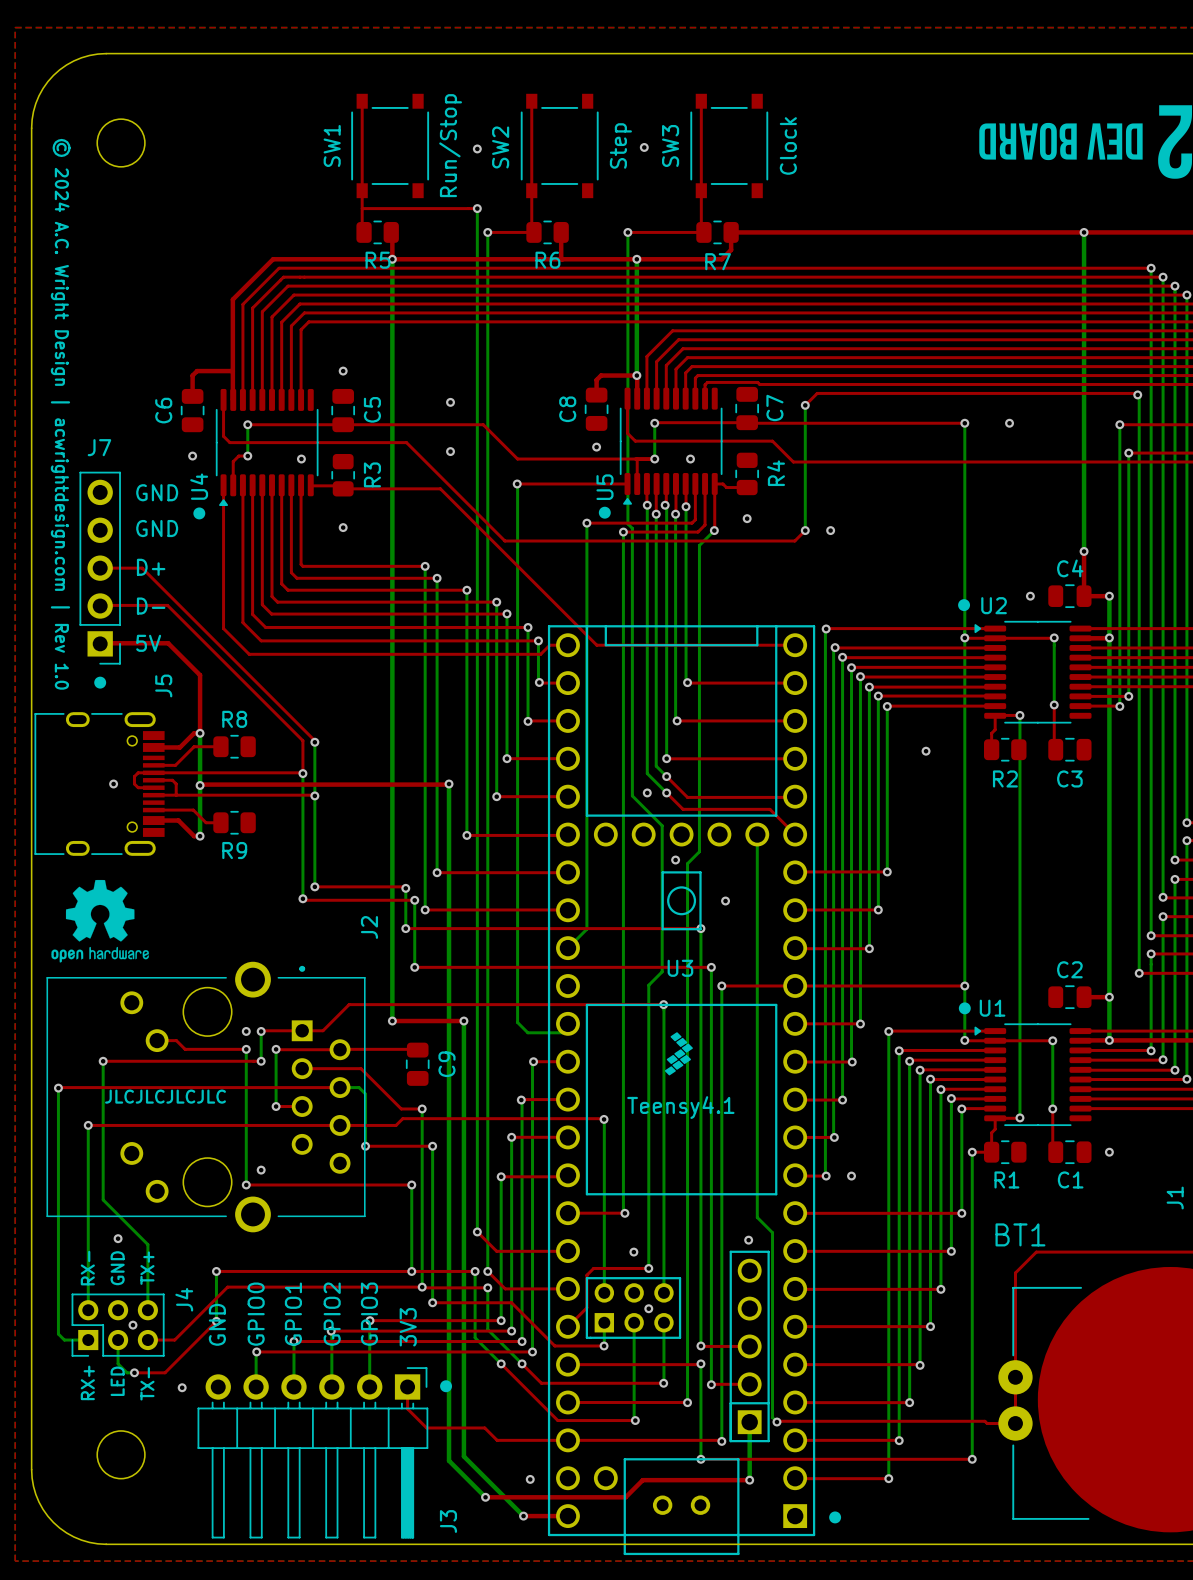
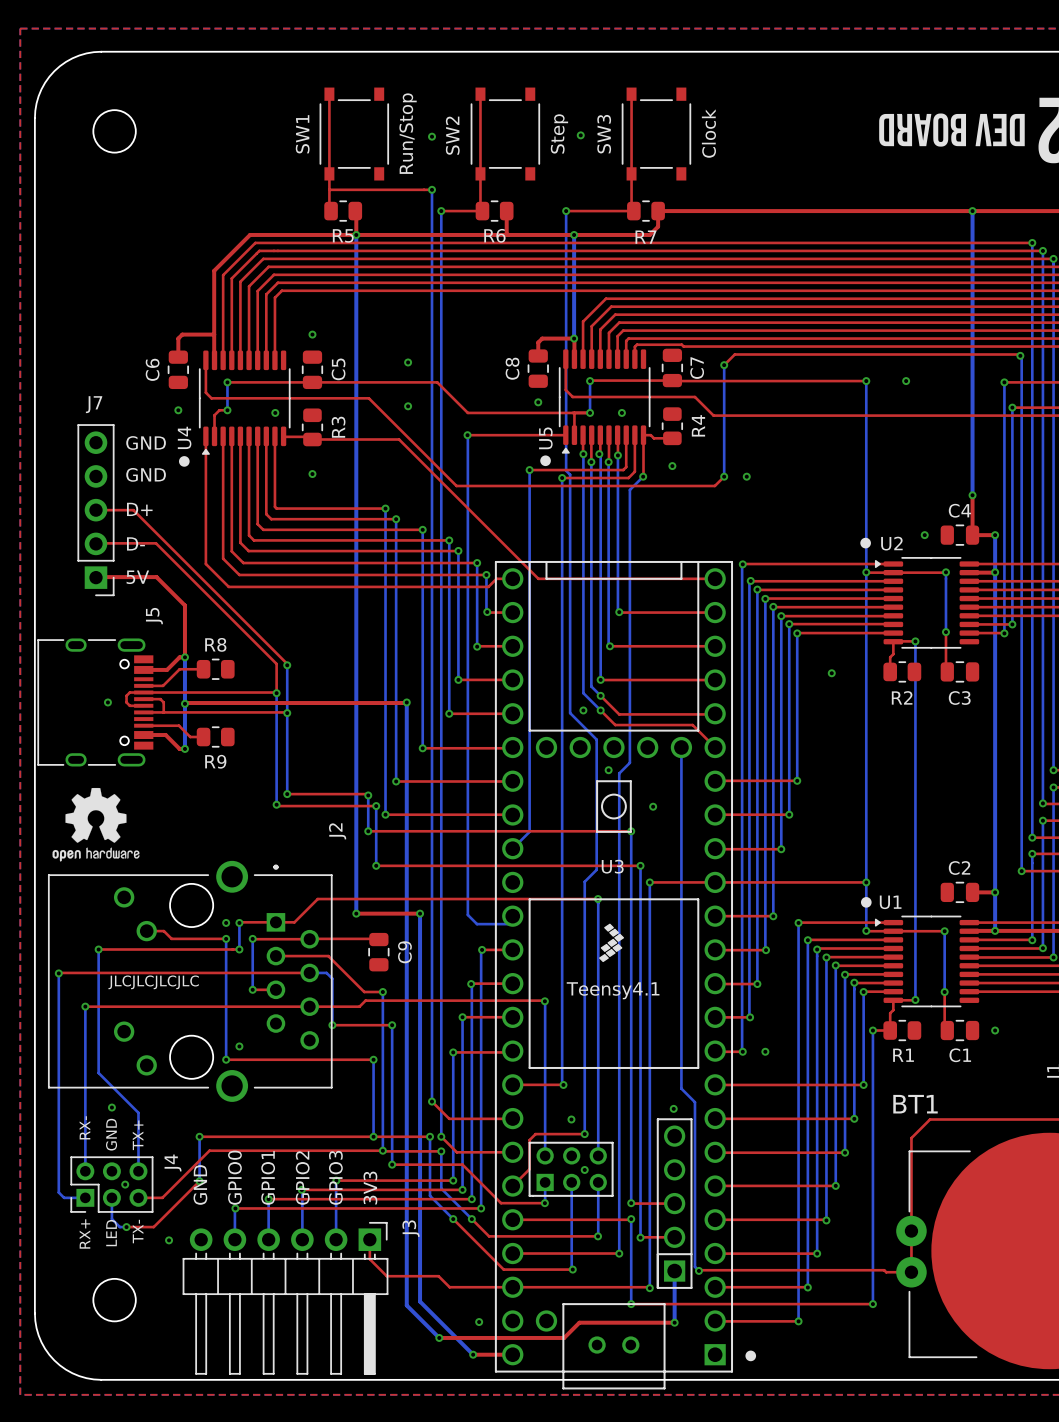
text: © 2024 A.C. Wright Design | acwrightdesign.com | Rev 1.0 (60, 414) -> none
drawing: [94, 676, 107, 689] -> none
drawing: [440, 1380, 453, 1393] -> none
J3 name position: J3 (448, 1521) -> J3 (410, 1228)

